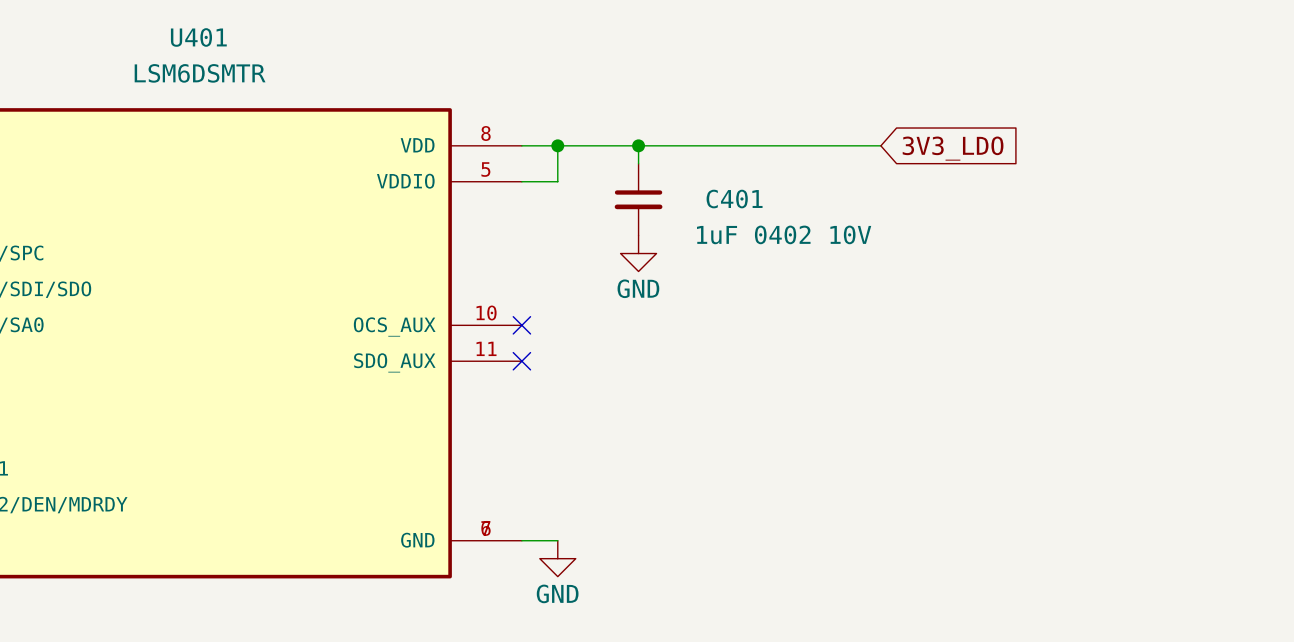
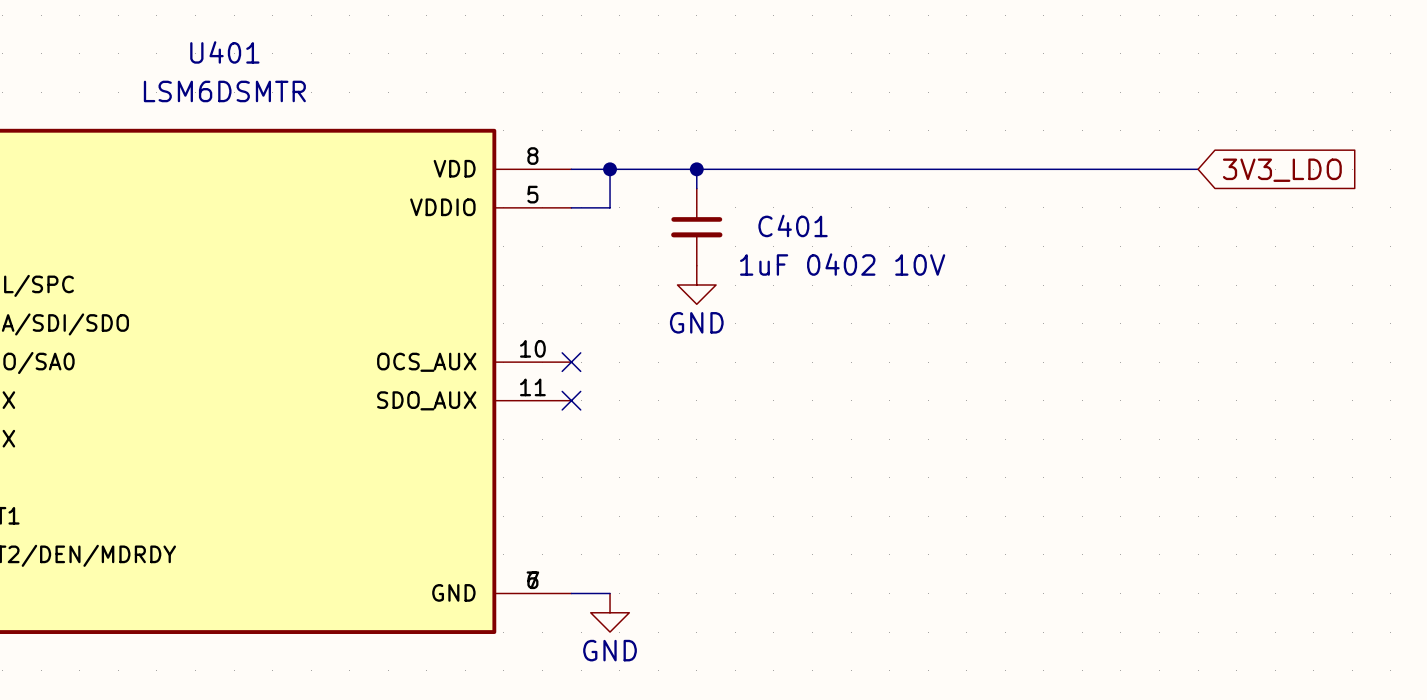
wire: none -> (957, 169) (1198, 169)
global label position: 3V3_LDO (953, 148) -> 3V3_LDO (1282, 170)

